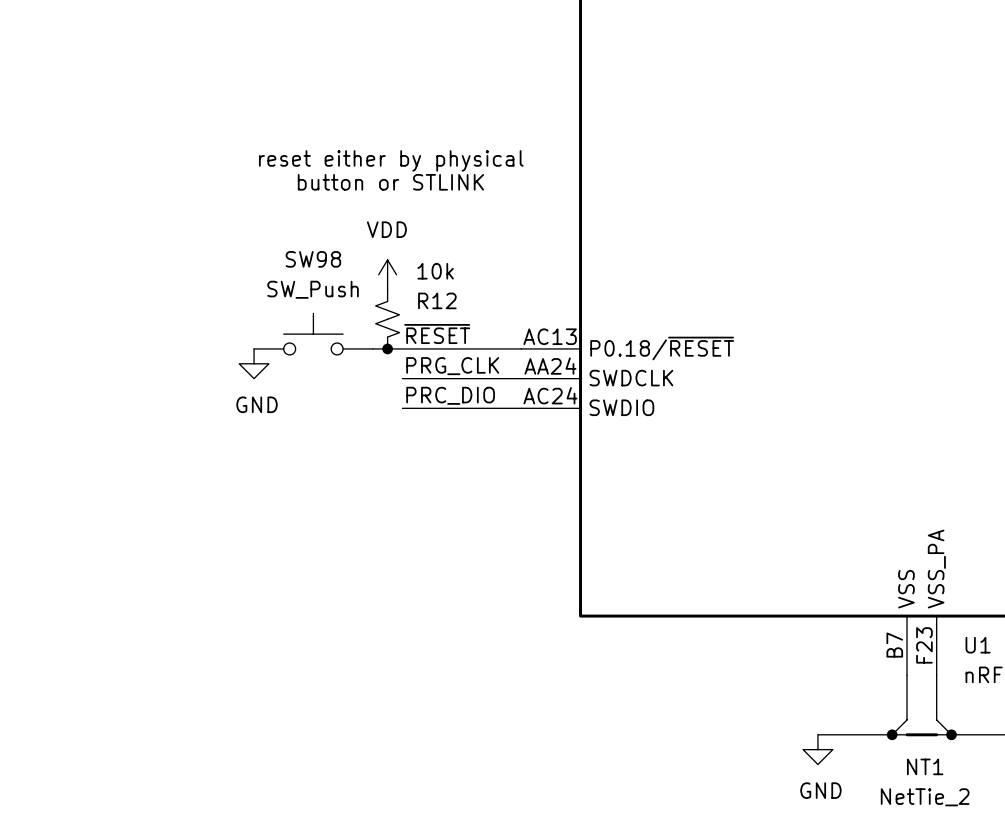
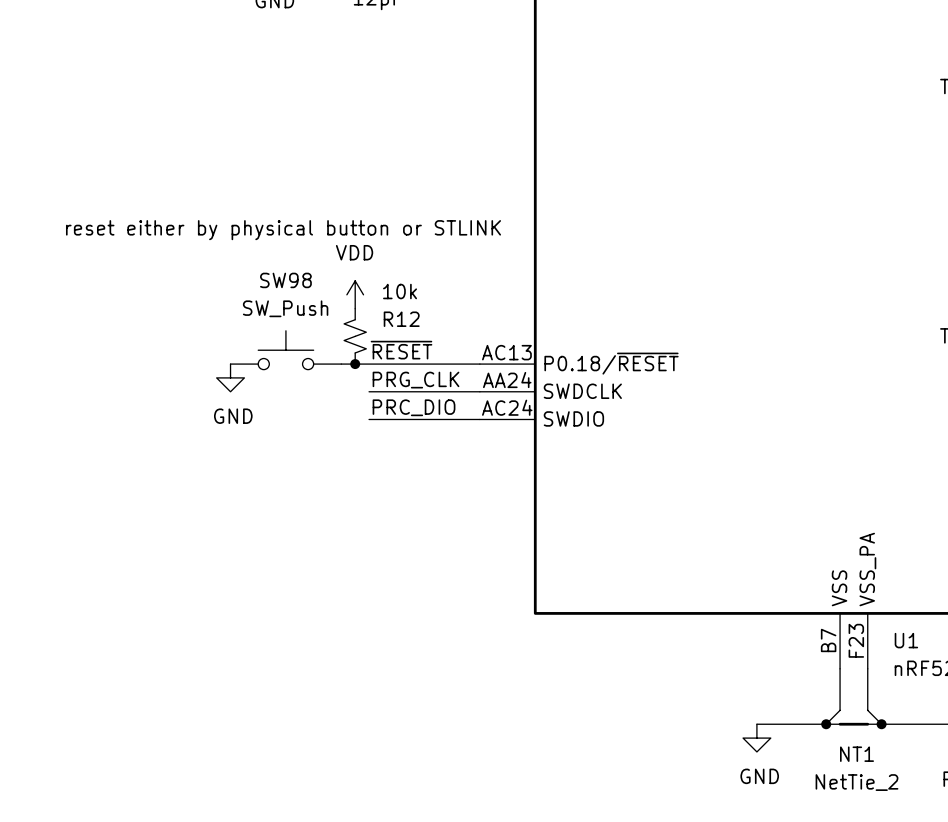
text: reset either by physical (391, 160) -> none
text: button or STLINK (390, 182) -> none
text: none -> reset either by physical button or STLINK (283, 230)

